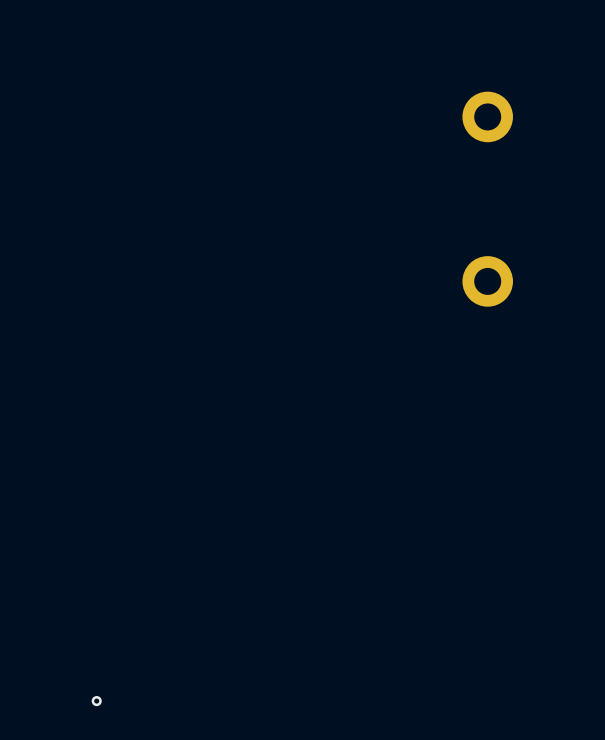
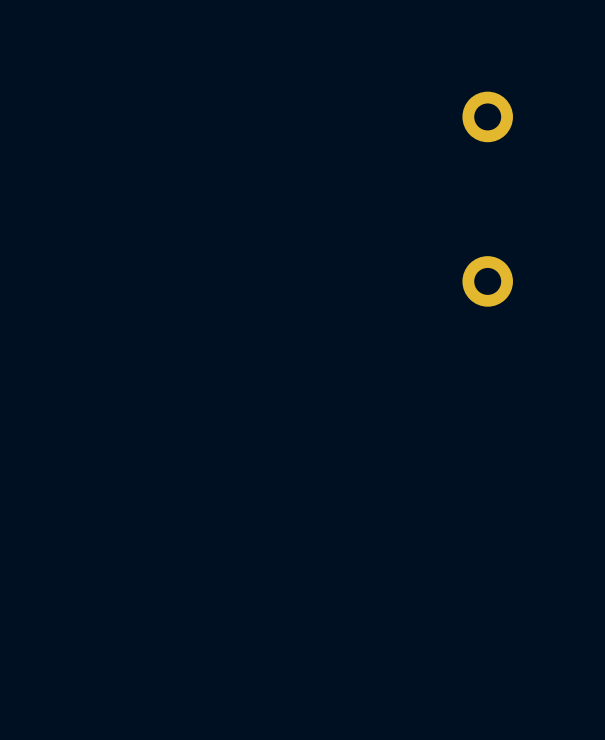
via: (96, 701) -> none

